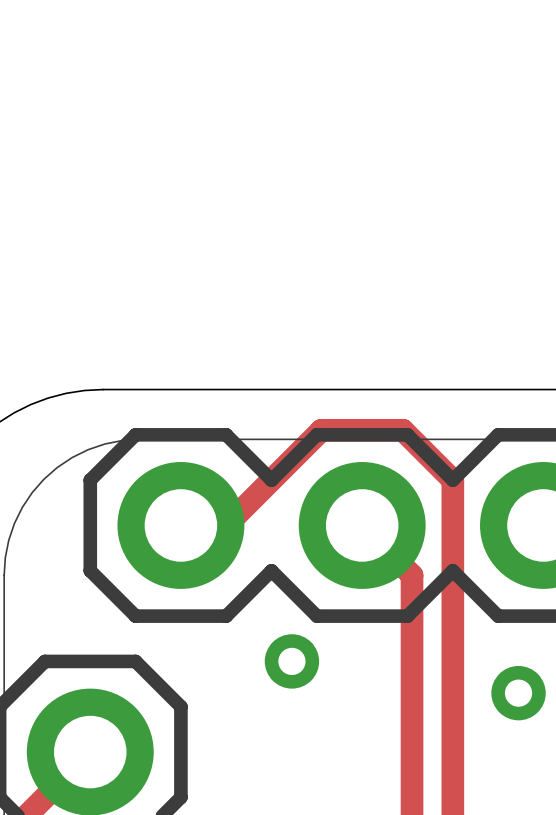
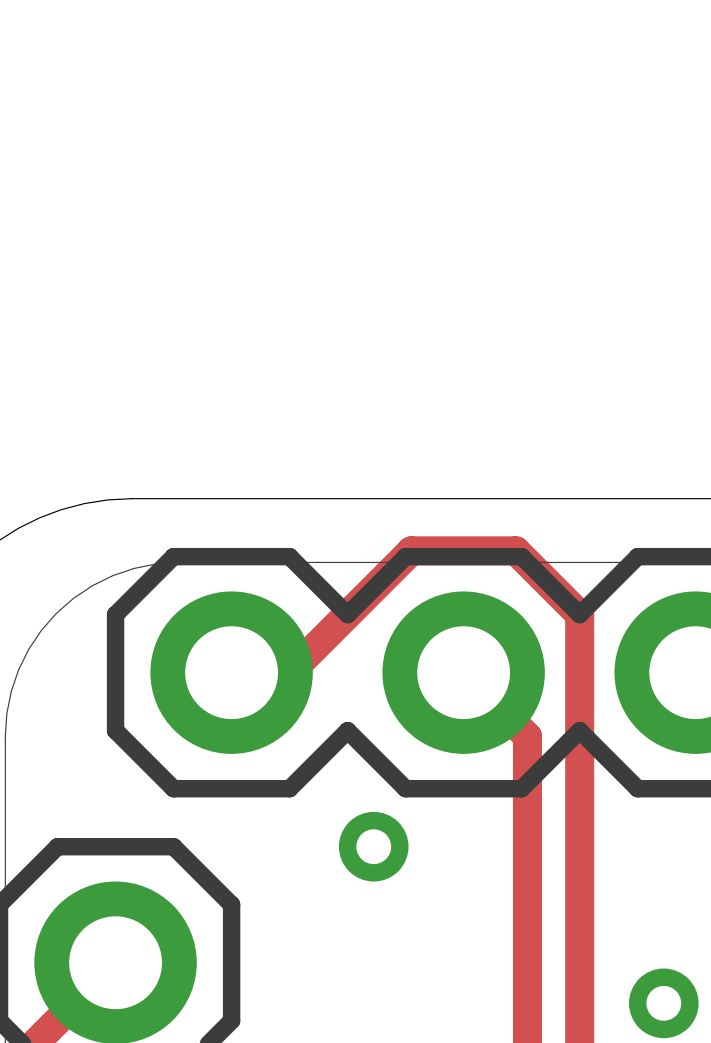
via: (518, 693) -> none
via: none -> (663, 1003)

